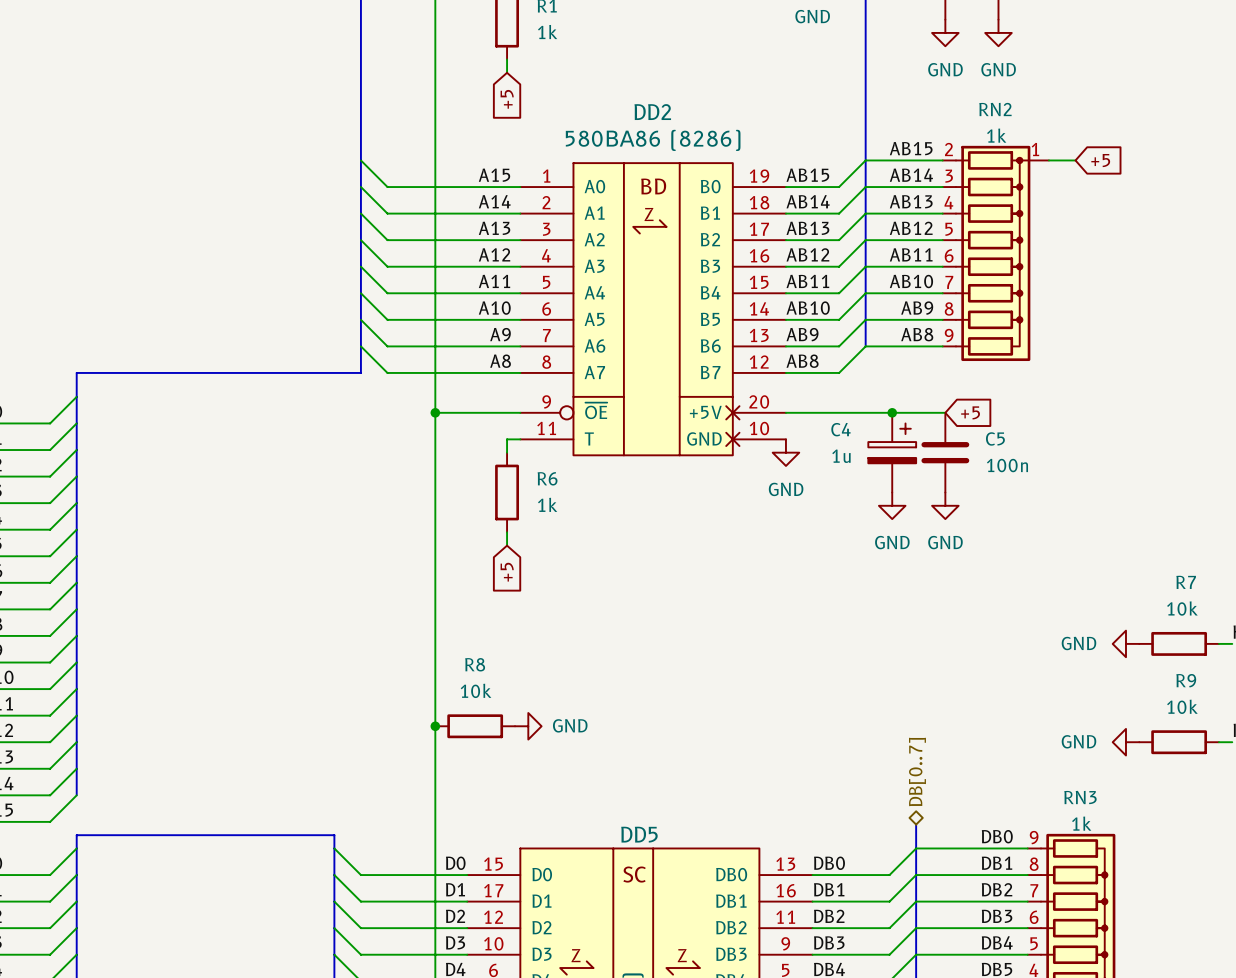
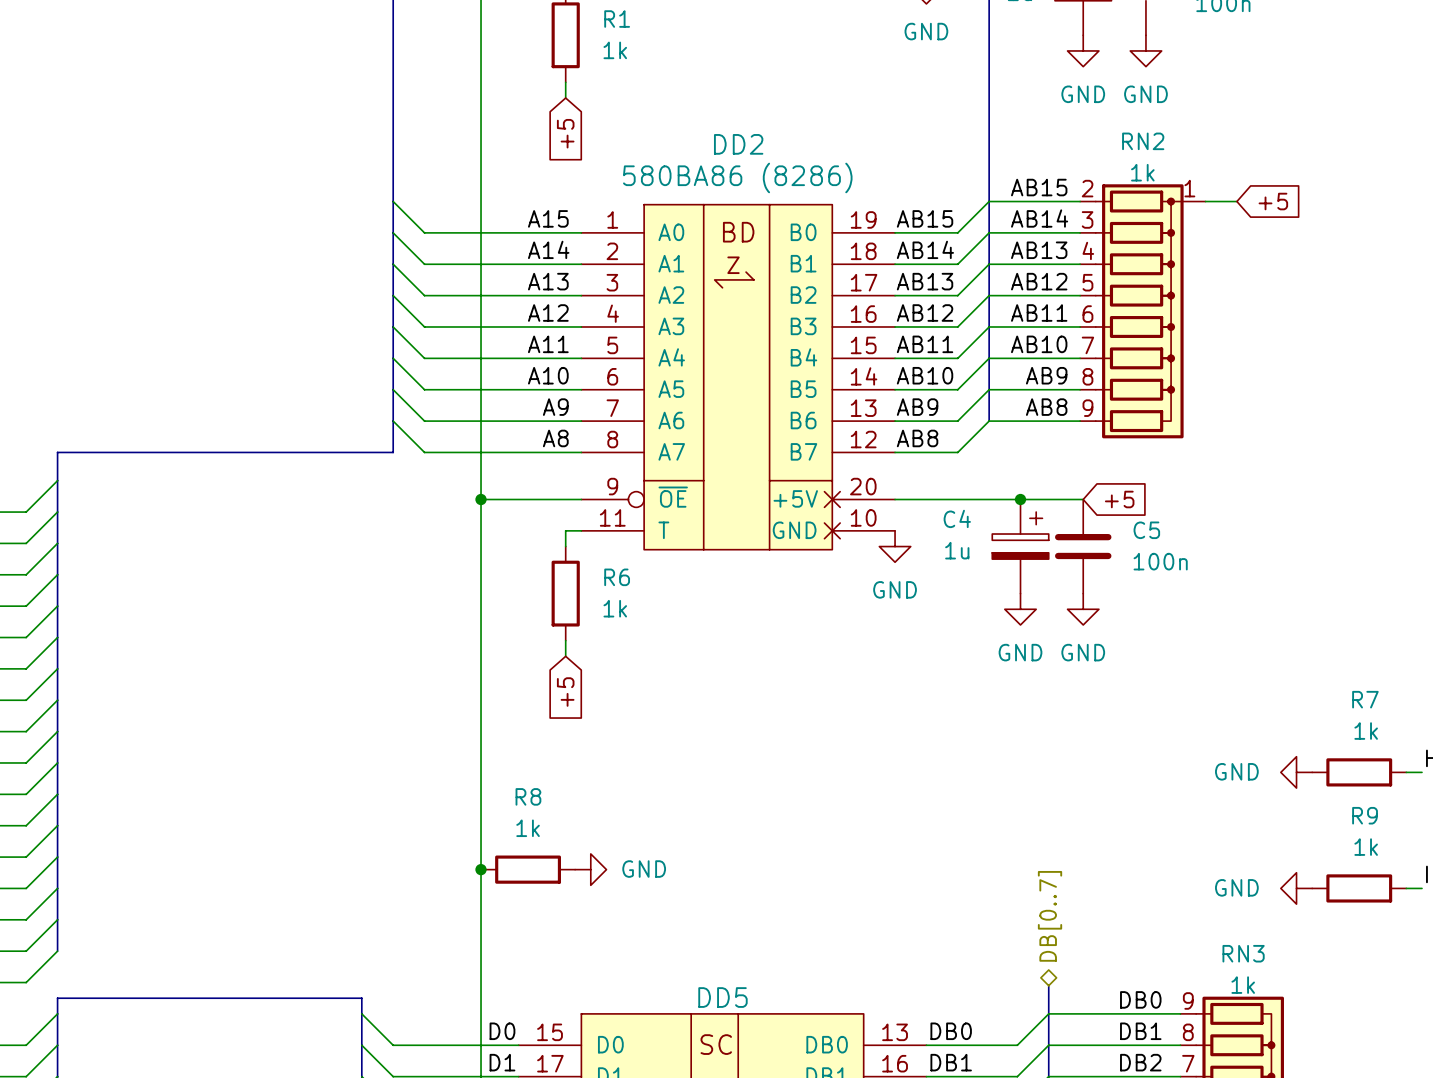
R7 value: 10k (1182, 608) -> 1k (1366, 731)
R8 value: 10k (476, 690) -> 1k (528, 828)
R9 value: 10k (1182, 706) -> 1k (1366, 847)

